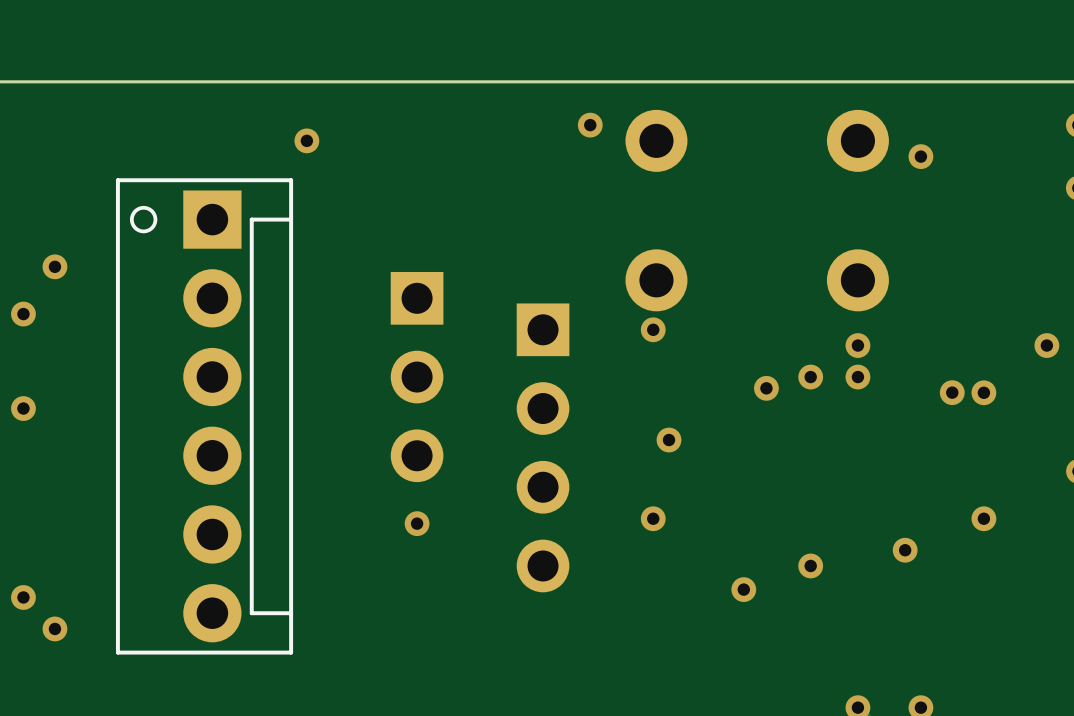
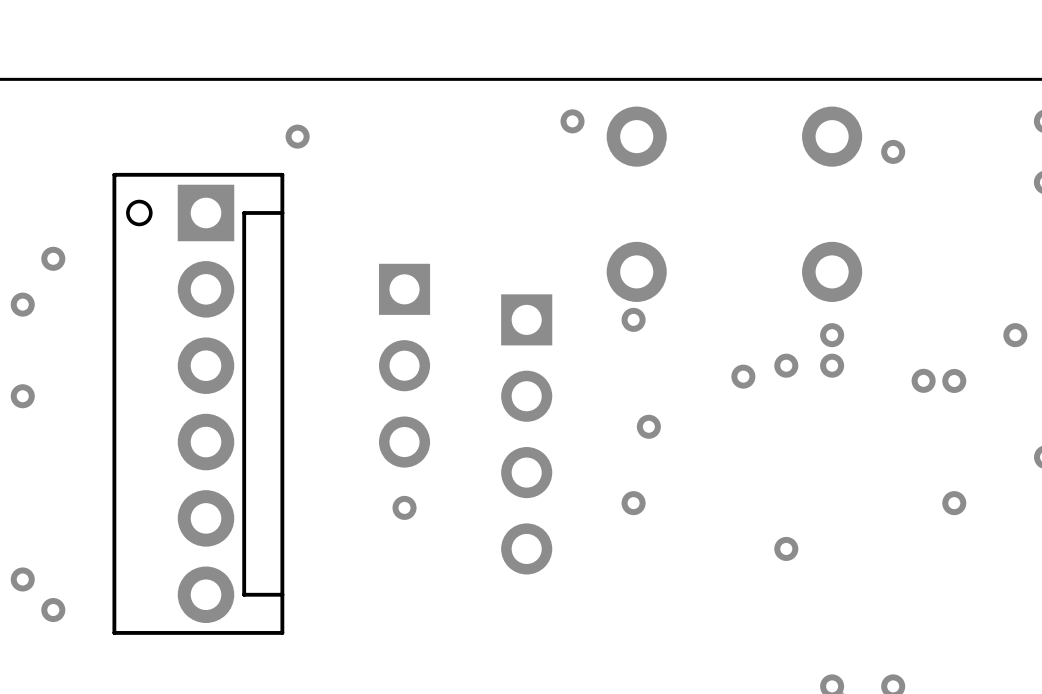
via: (905, 550) -> none
via: (743, 589) -> none

